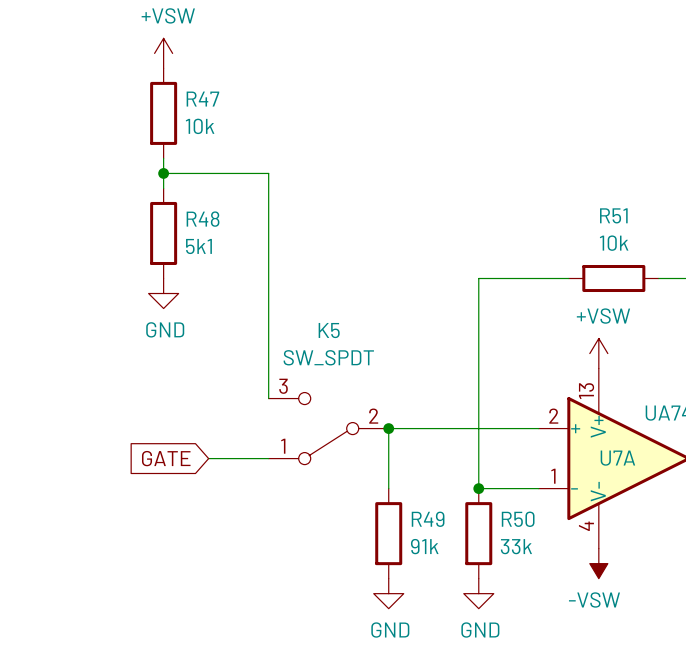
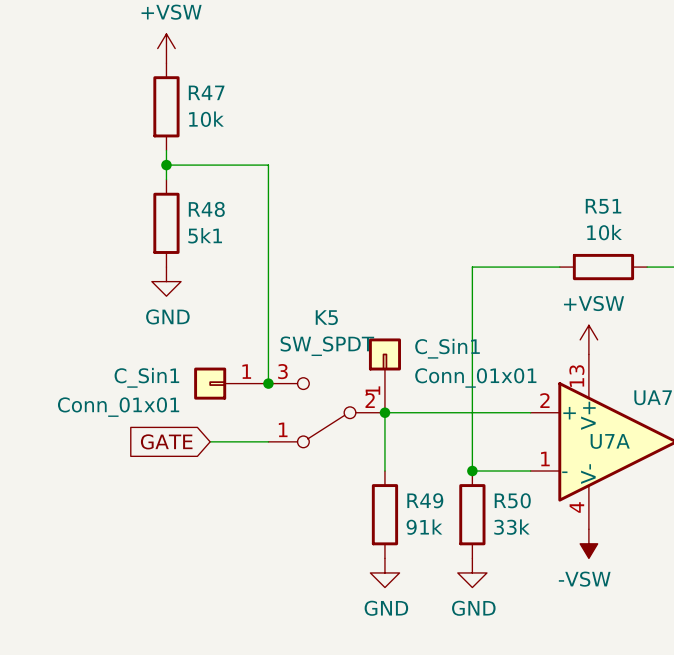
C_Sin1: none -> Conn_01x01 (384, 375)
C_Sin1: none -> Conn_01x01 (231, 383)
junction: none -> (268, 383)

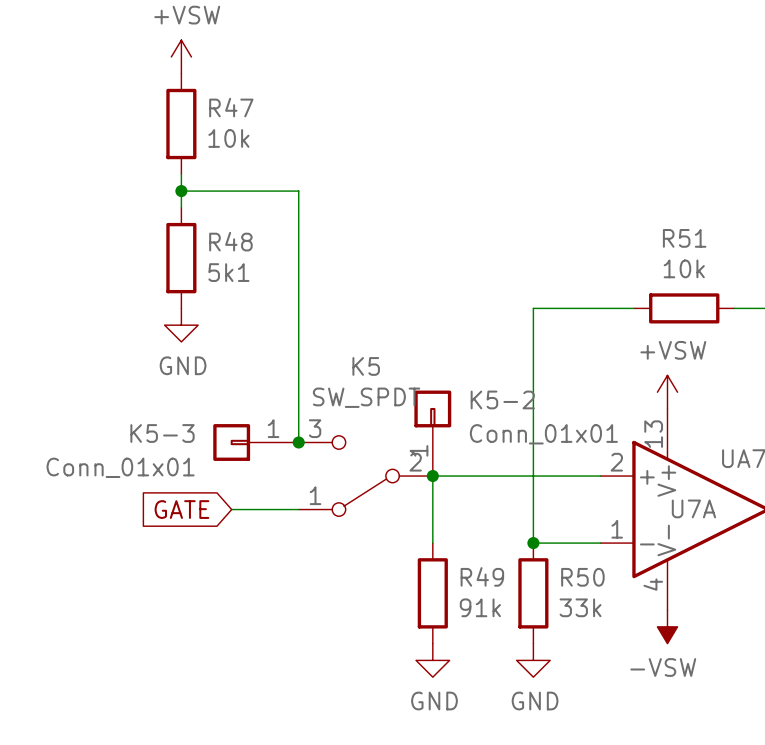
C_Sin1 name: C_Sin1 (447, 348) -> K5-2 (502, 399)
C_Sin1 name: C_Sin1 (146, 377) -> K5-3 (162, 433)

